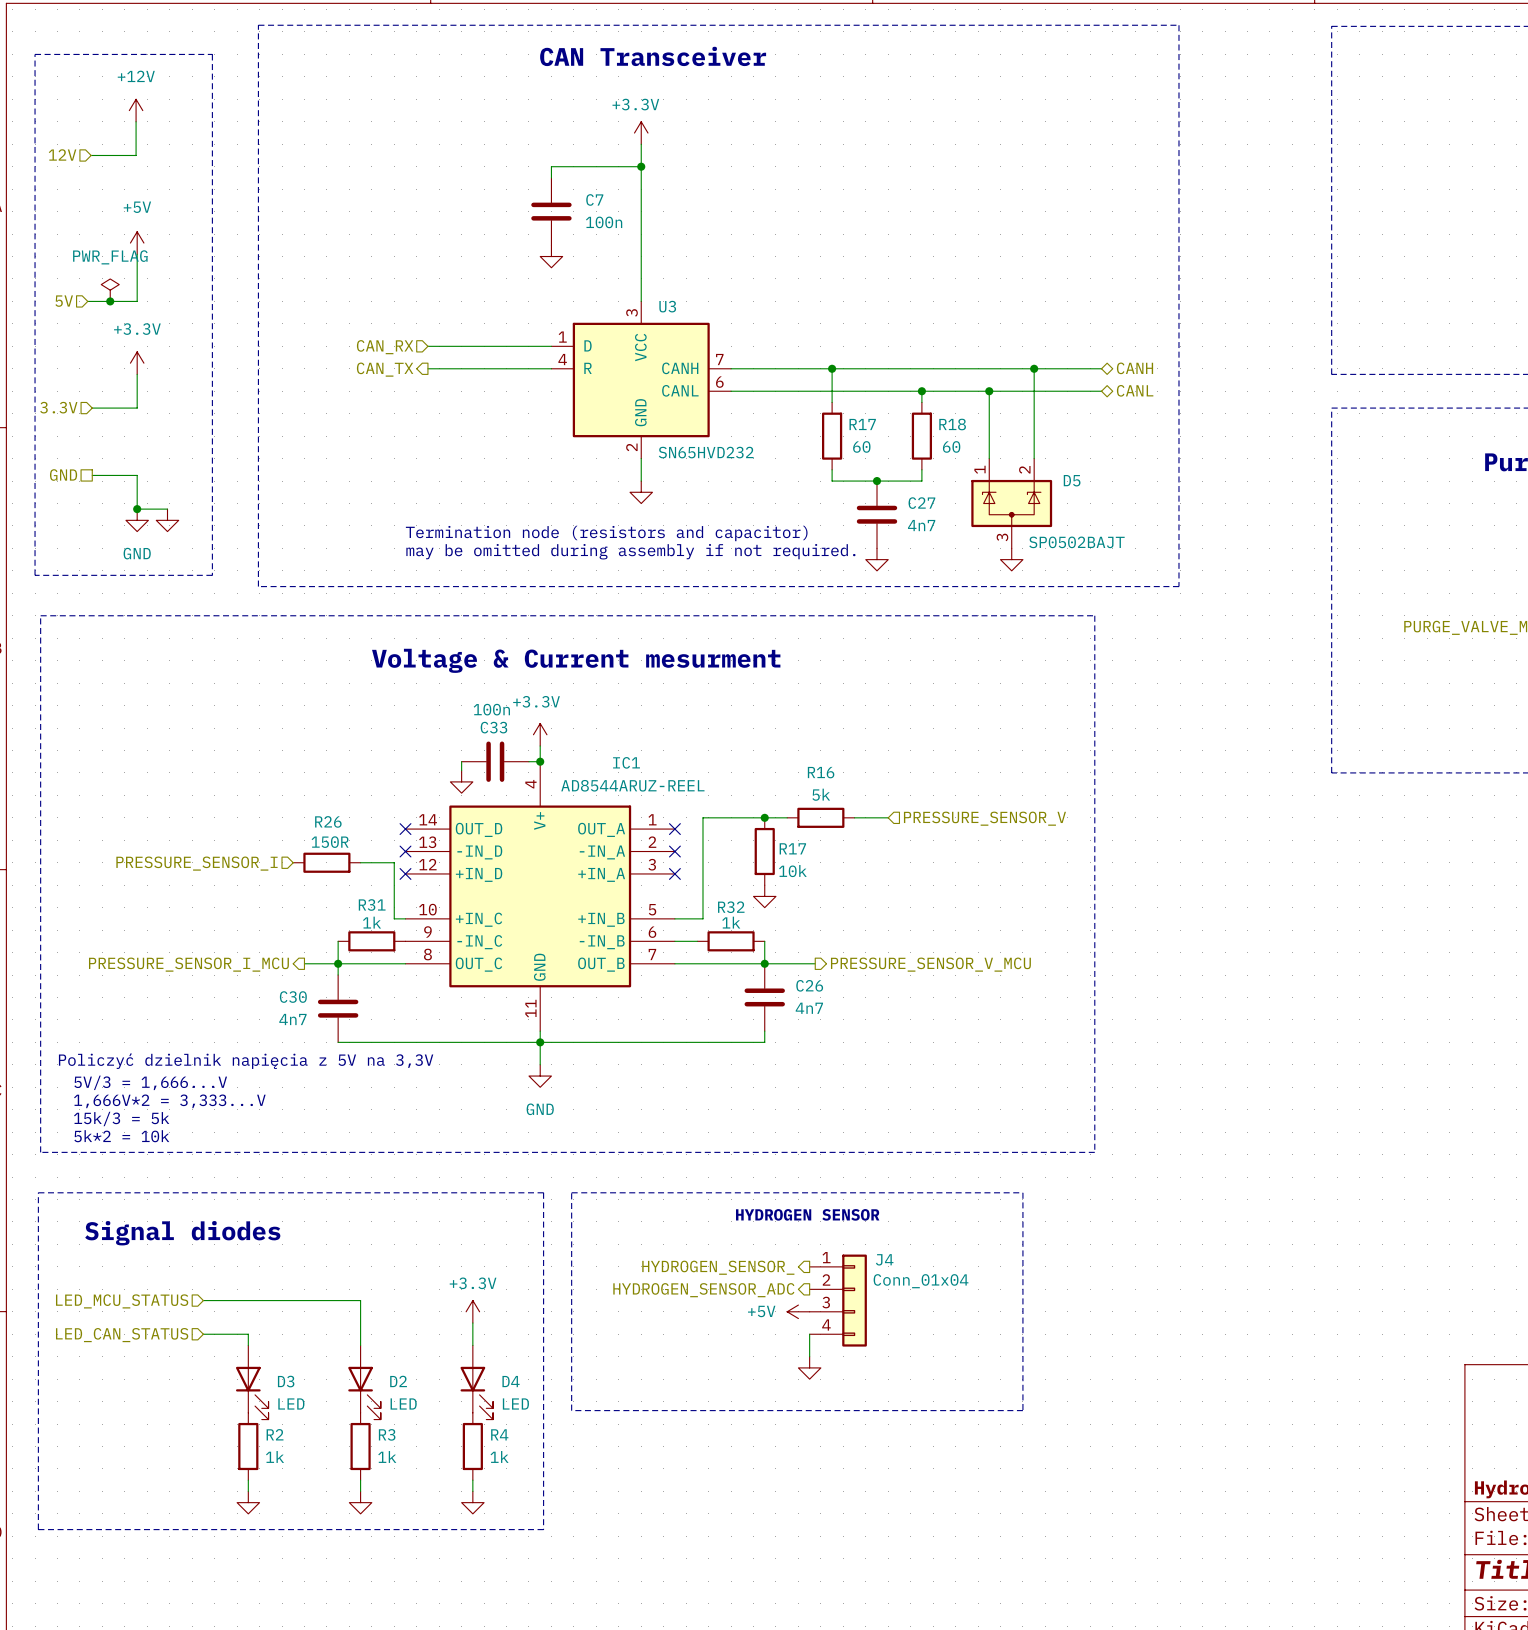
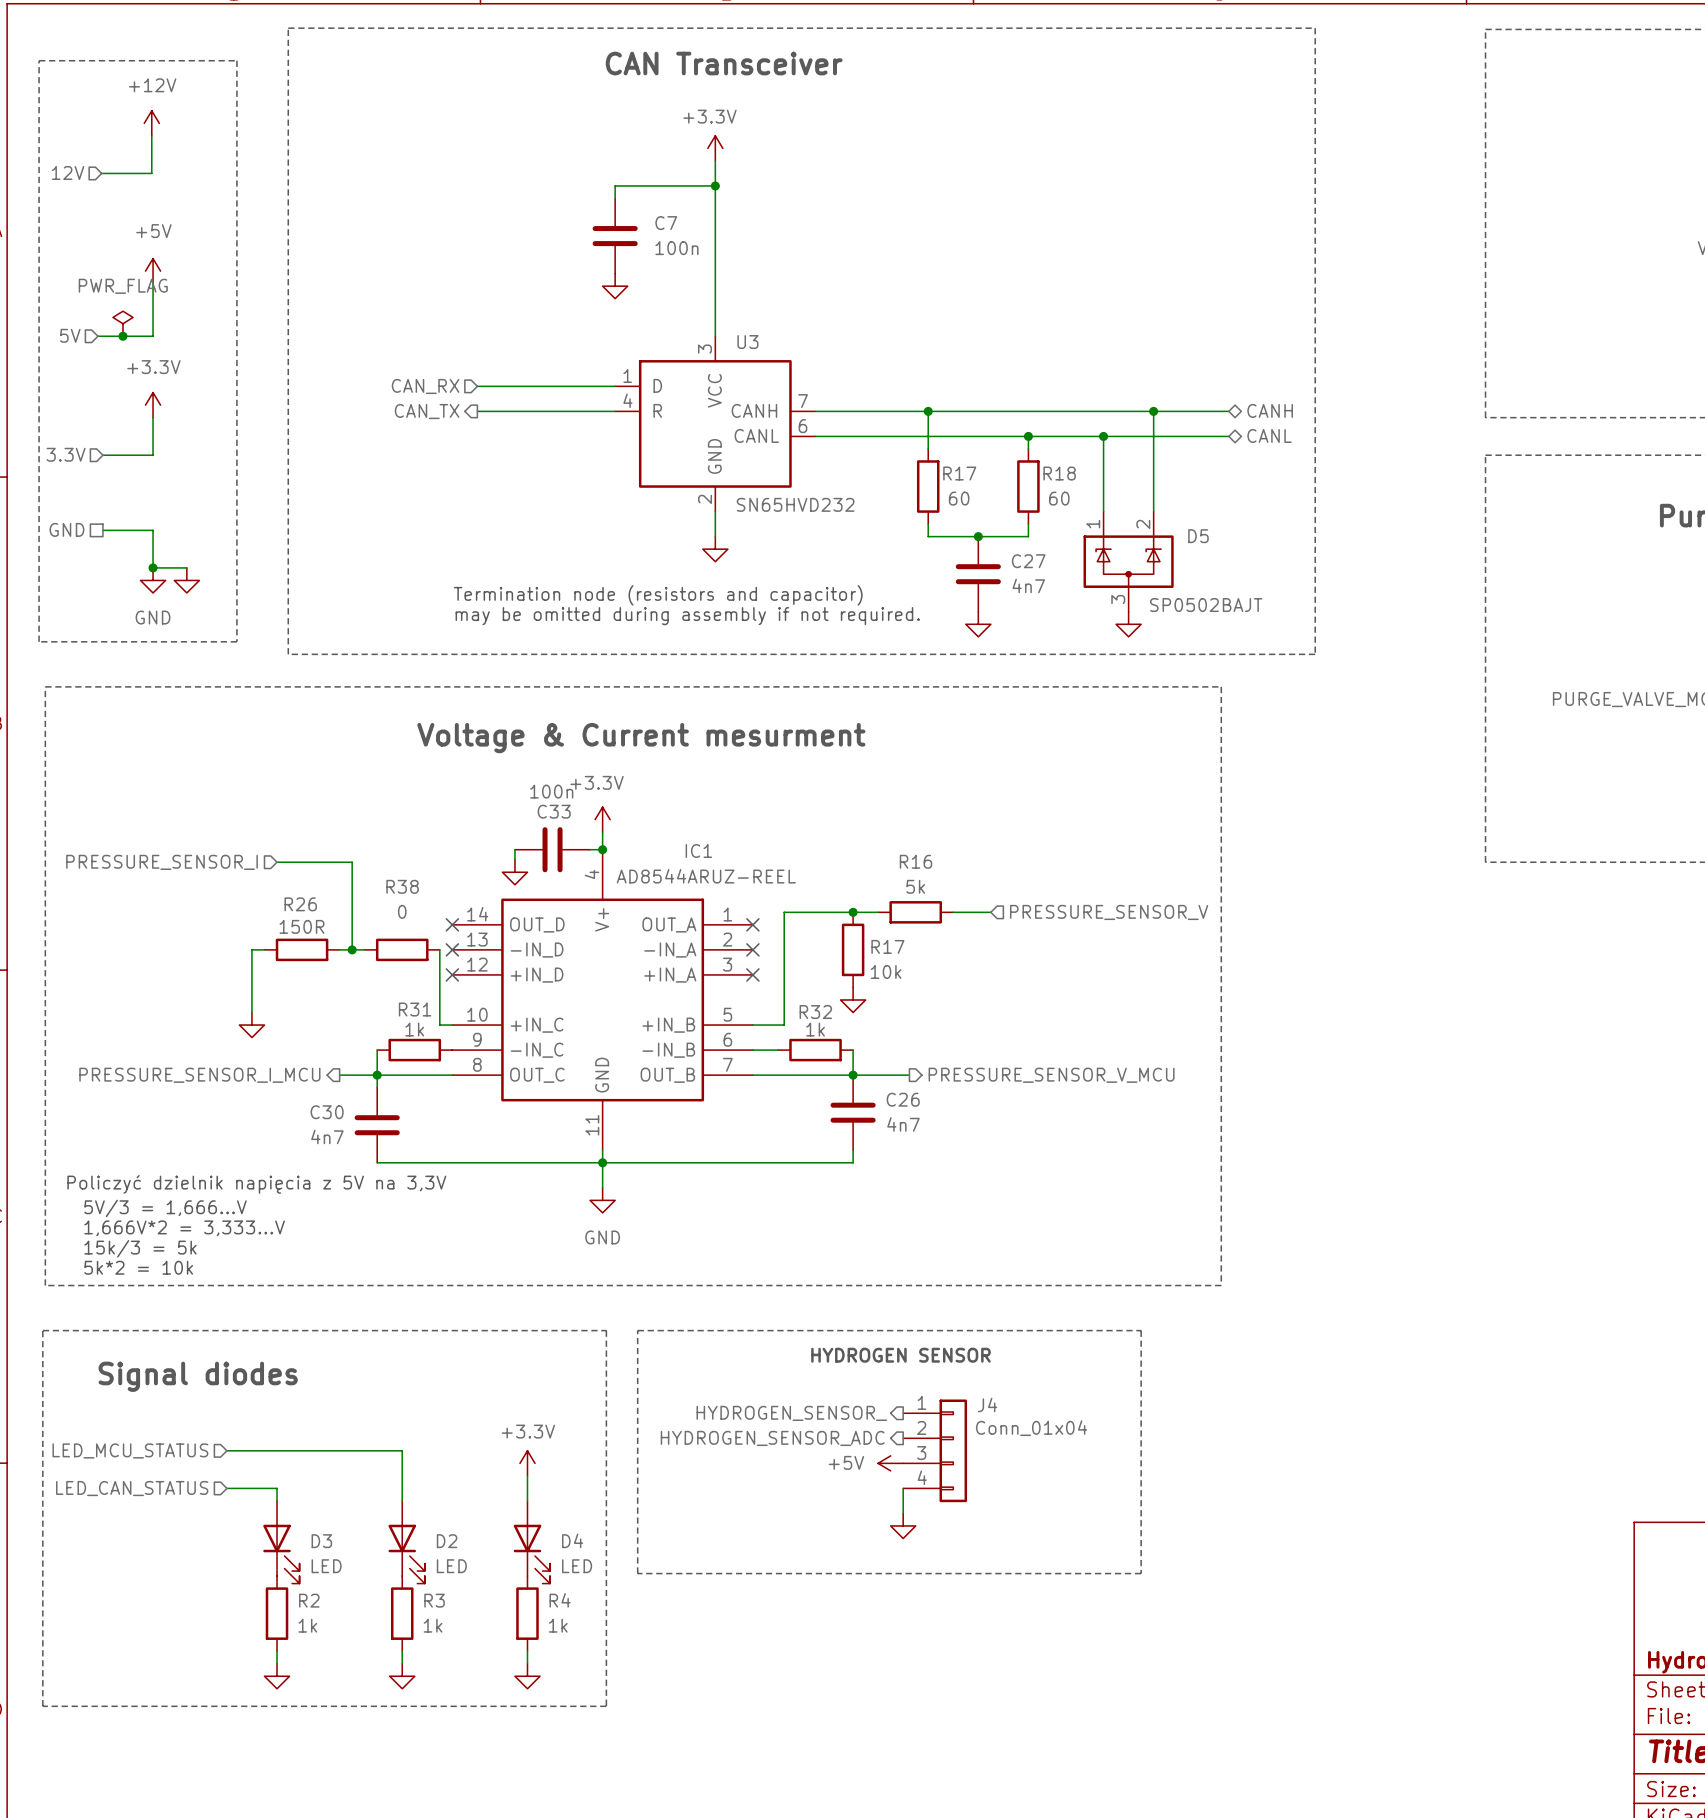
wire: none -> (277, 862) (352, 862) (352, 949)
wire: none -> (264, 949) (251, 949) (251, 1012)
wire: none -> (339, 949) (364, 949)
junction: none -> (352, 949)
R38: none -> 0 (402, 949)
R26 position: (326, 862) -> (302, 949)
wire: (360, 862) (394, 862) -> (439, 949) (439, 962)
hierarchical label position: PRESSURE_SENSOR_I (196, 863) -> PRESSURE_SENSOR_I (162, 862)
power symbol: none -> (251, 1025)

